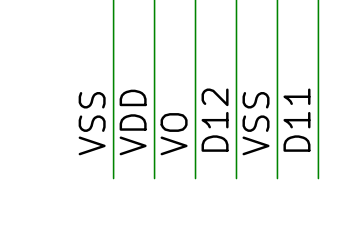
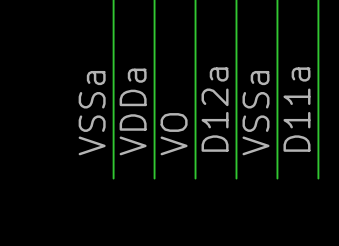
label: D12 (215, 120) -> D12a (215, 109)
label: D11 (296, 120) -> D11a (296, 109)
label: VDD (133, 122) -> VDDa (133, 111)
label: VSS (92, 123) -> VSSa (92, 113)
label: VSS (256, 123) -> VSSa (256, 113)

